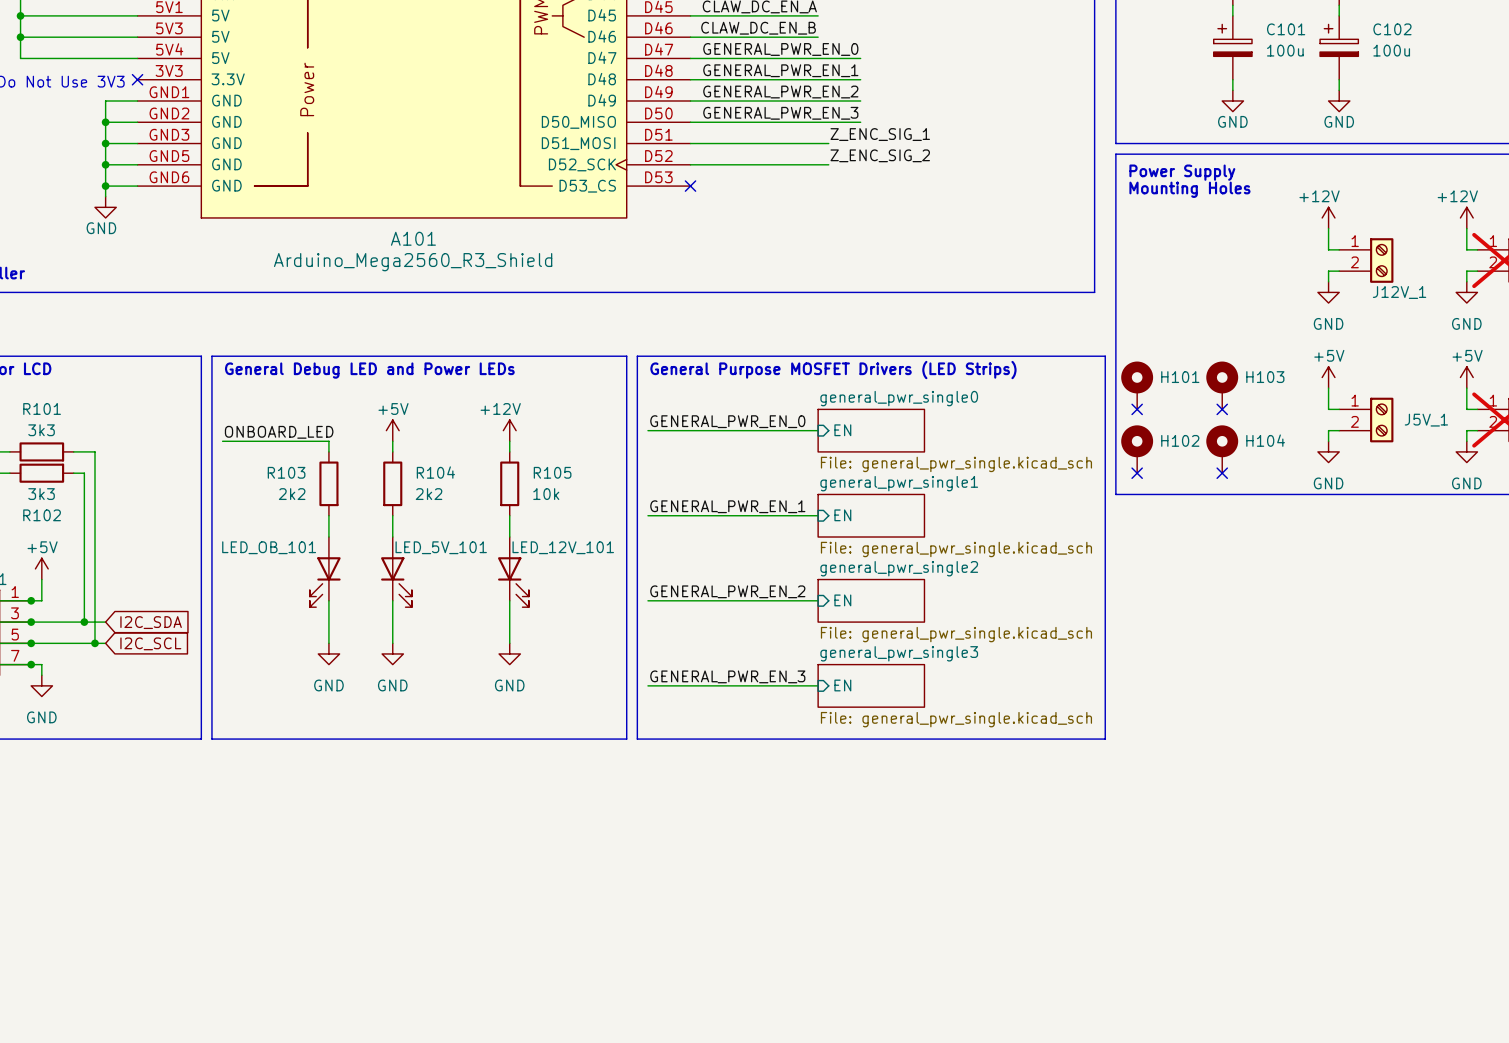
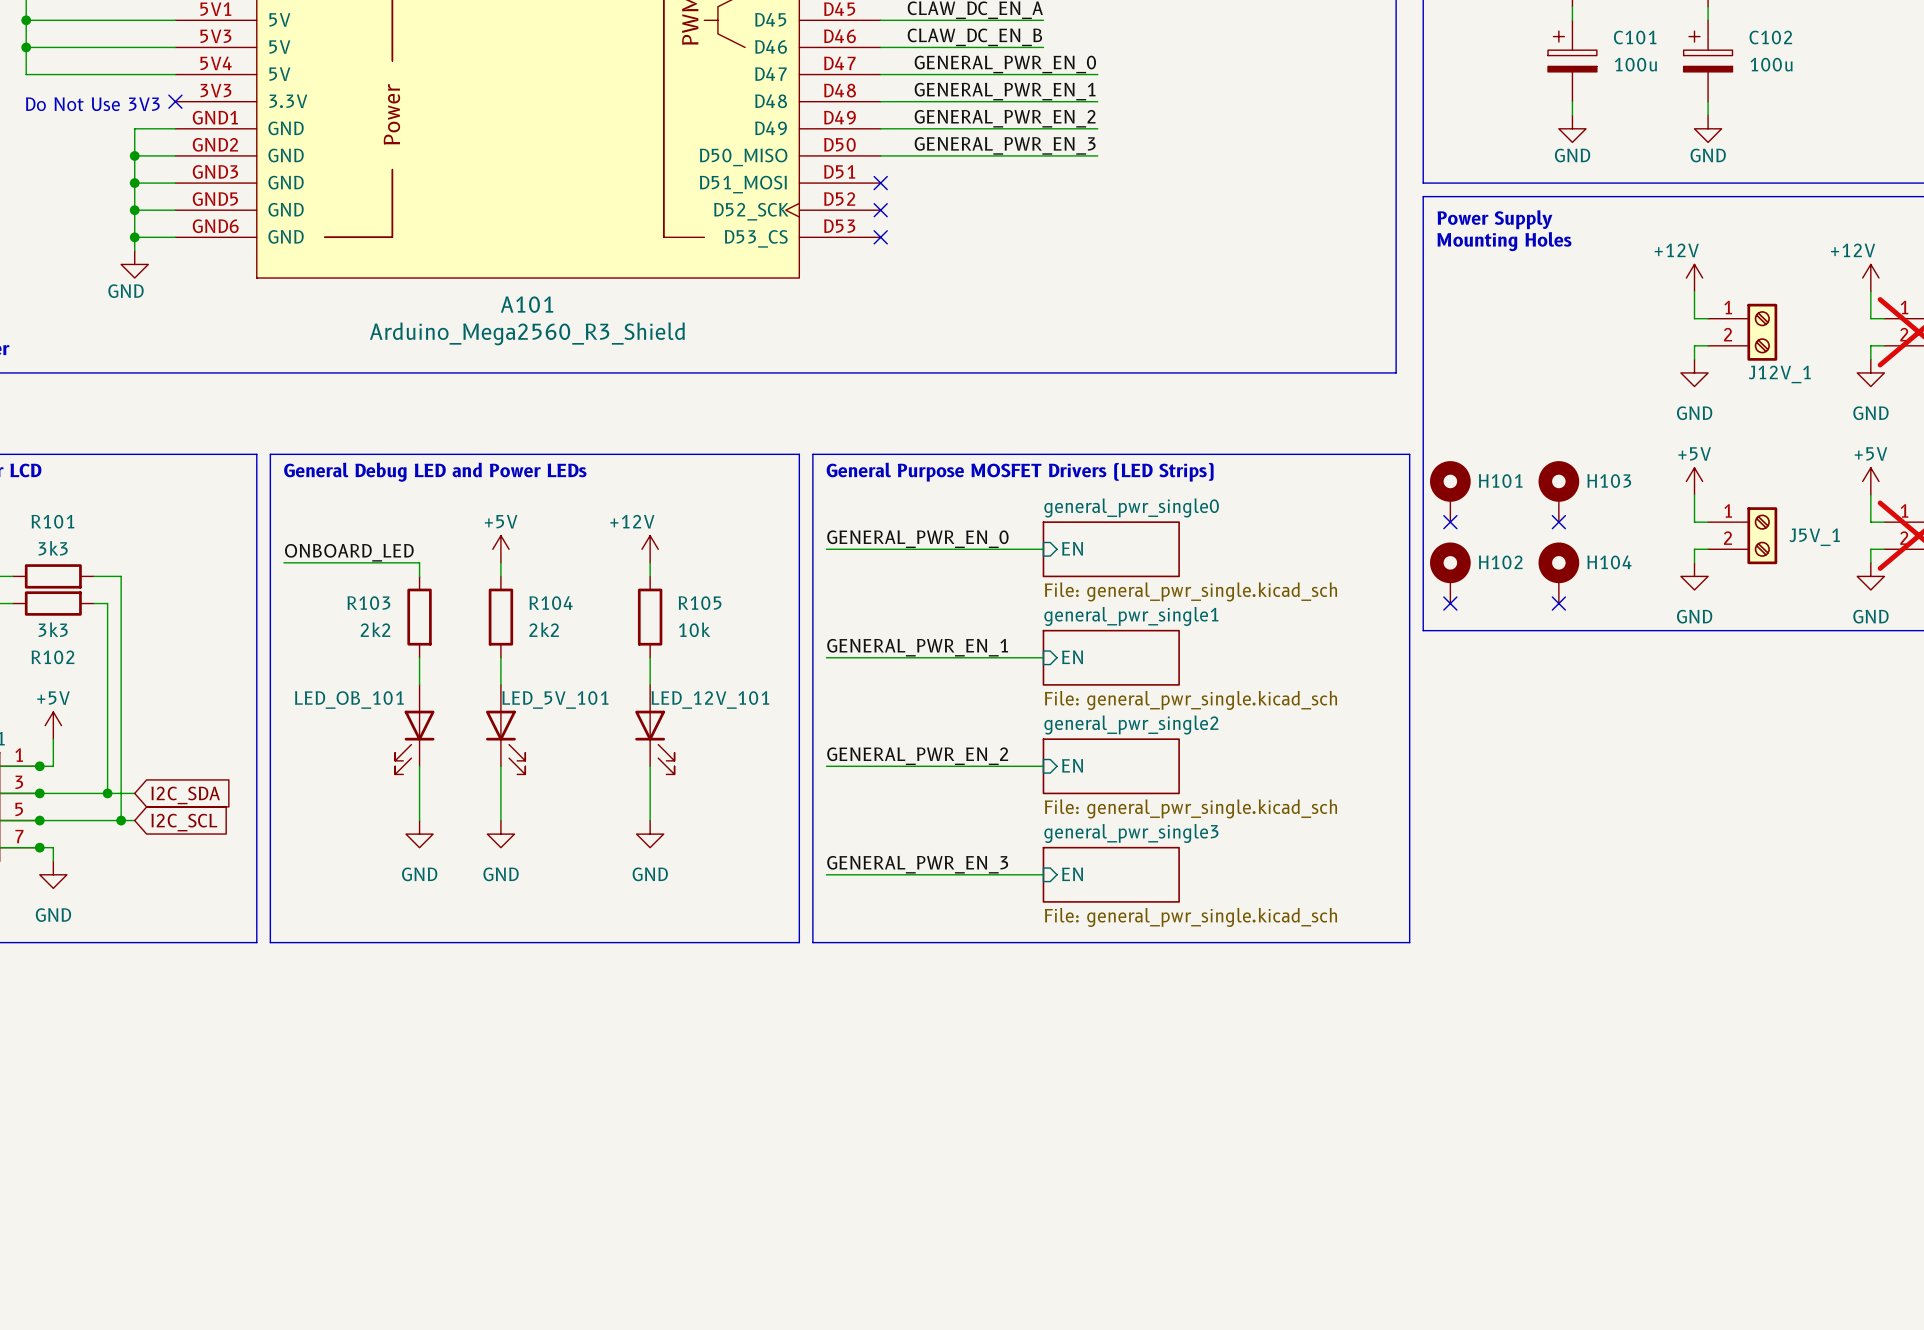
label: Z_ENC_SIG_1 (880, 134) -> none
wire: (690, 143) (828, 143) -> none
no-connect mark: none -> (880, 183)
label: Z_ENC_SIG_2 (880, 155) -> none
wire: (690, 164) (828, 164) -> none
no-connect mark: none -> (880, 210)

